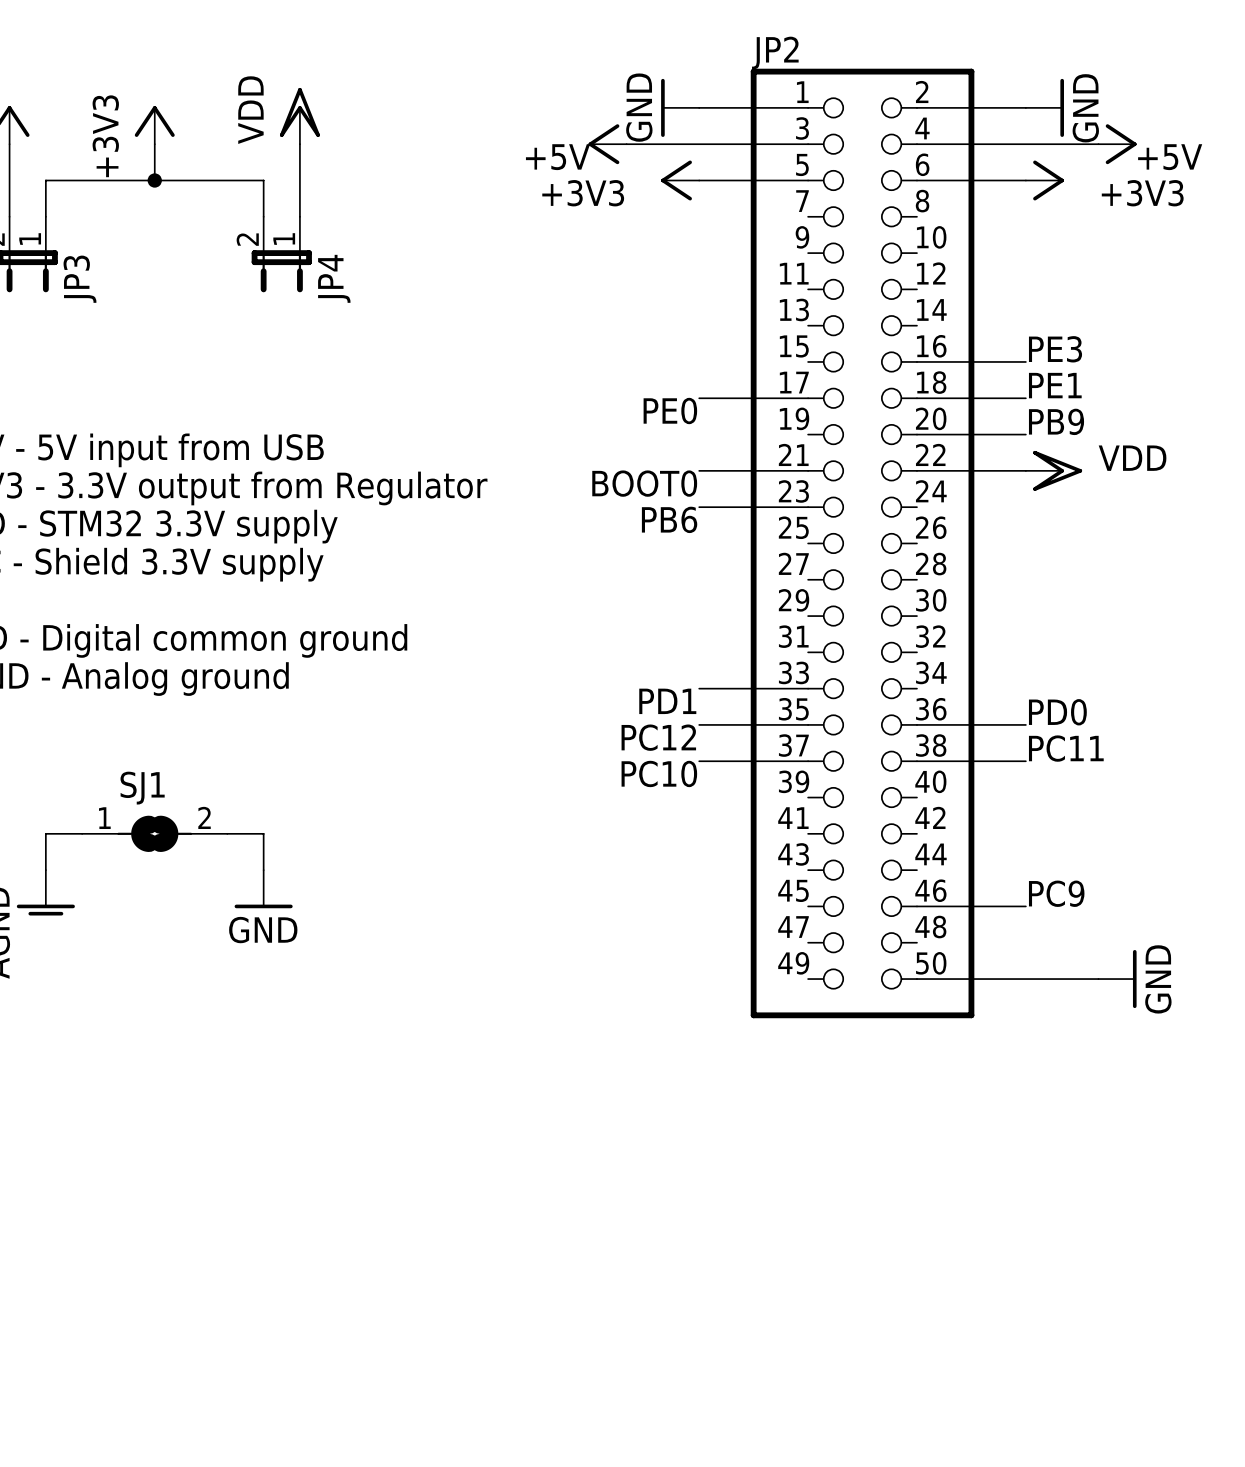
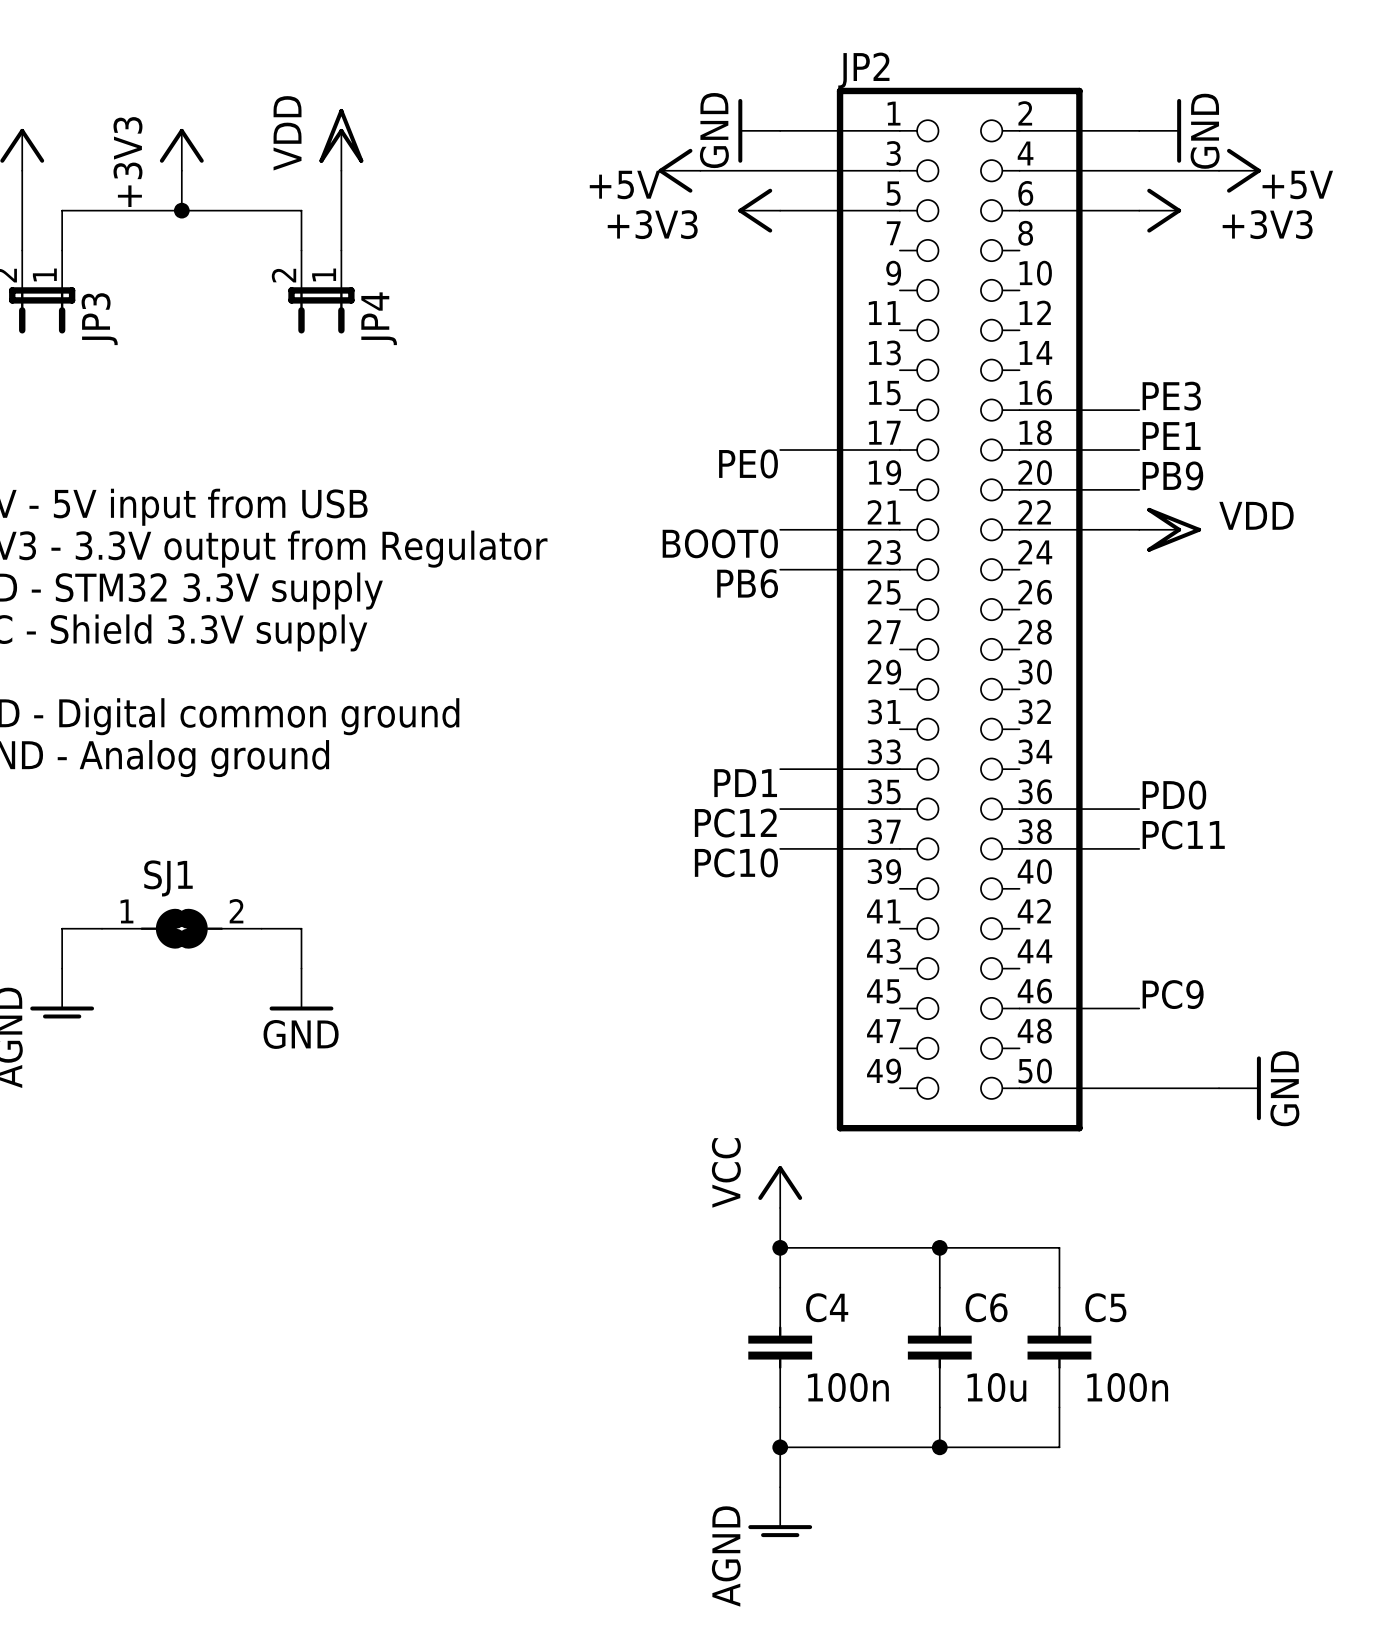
power symbol: none -> VCC (780, 1187)
wire: none -> (780, 1207) (780, 1287)
wire: none -> (780, 1247) (1059, 1247) (1059, 1287)
junction: none -> (780, 1247)
wire: none -> (939, 1247) (939, 1287)
junction: none -> (939, 1247)
C4: none -> 100n (780, 1347)
C6: none -> 10u (939, 1347)
C5: none -> 100n (1059, 1347)
wire: none -> (780, 1407) (780, 1487)
wire: none -> (939, 1407) (939, 1447)
wire: none -> (1059, 1407) (1059, 1447) (780, 1447)
junction: none -> (780, 1447)
junction: none -> (939, 1447)
power symbol: none -> AGND (780, 1512)

